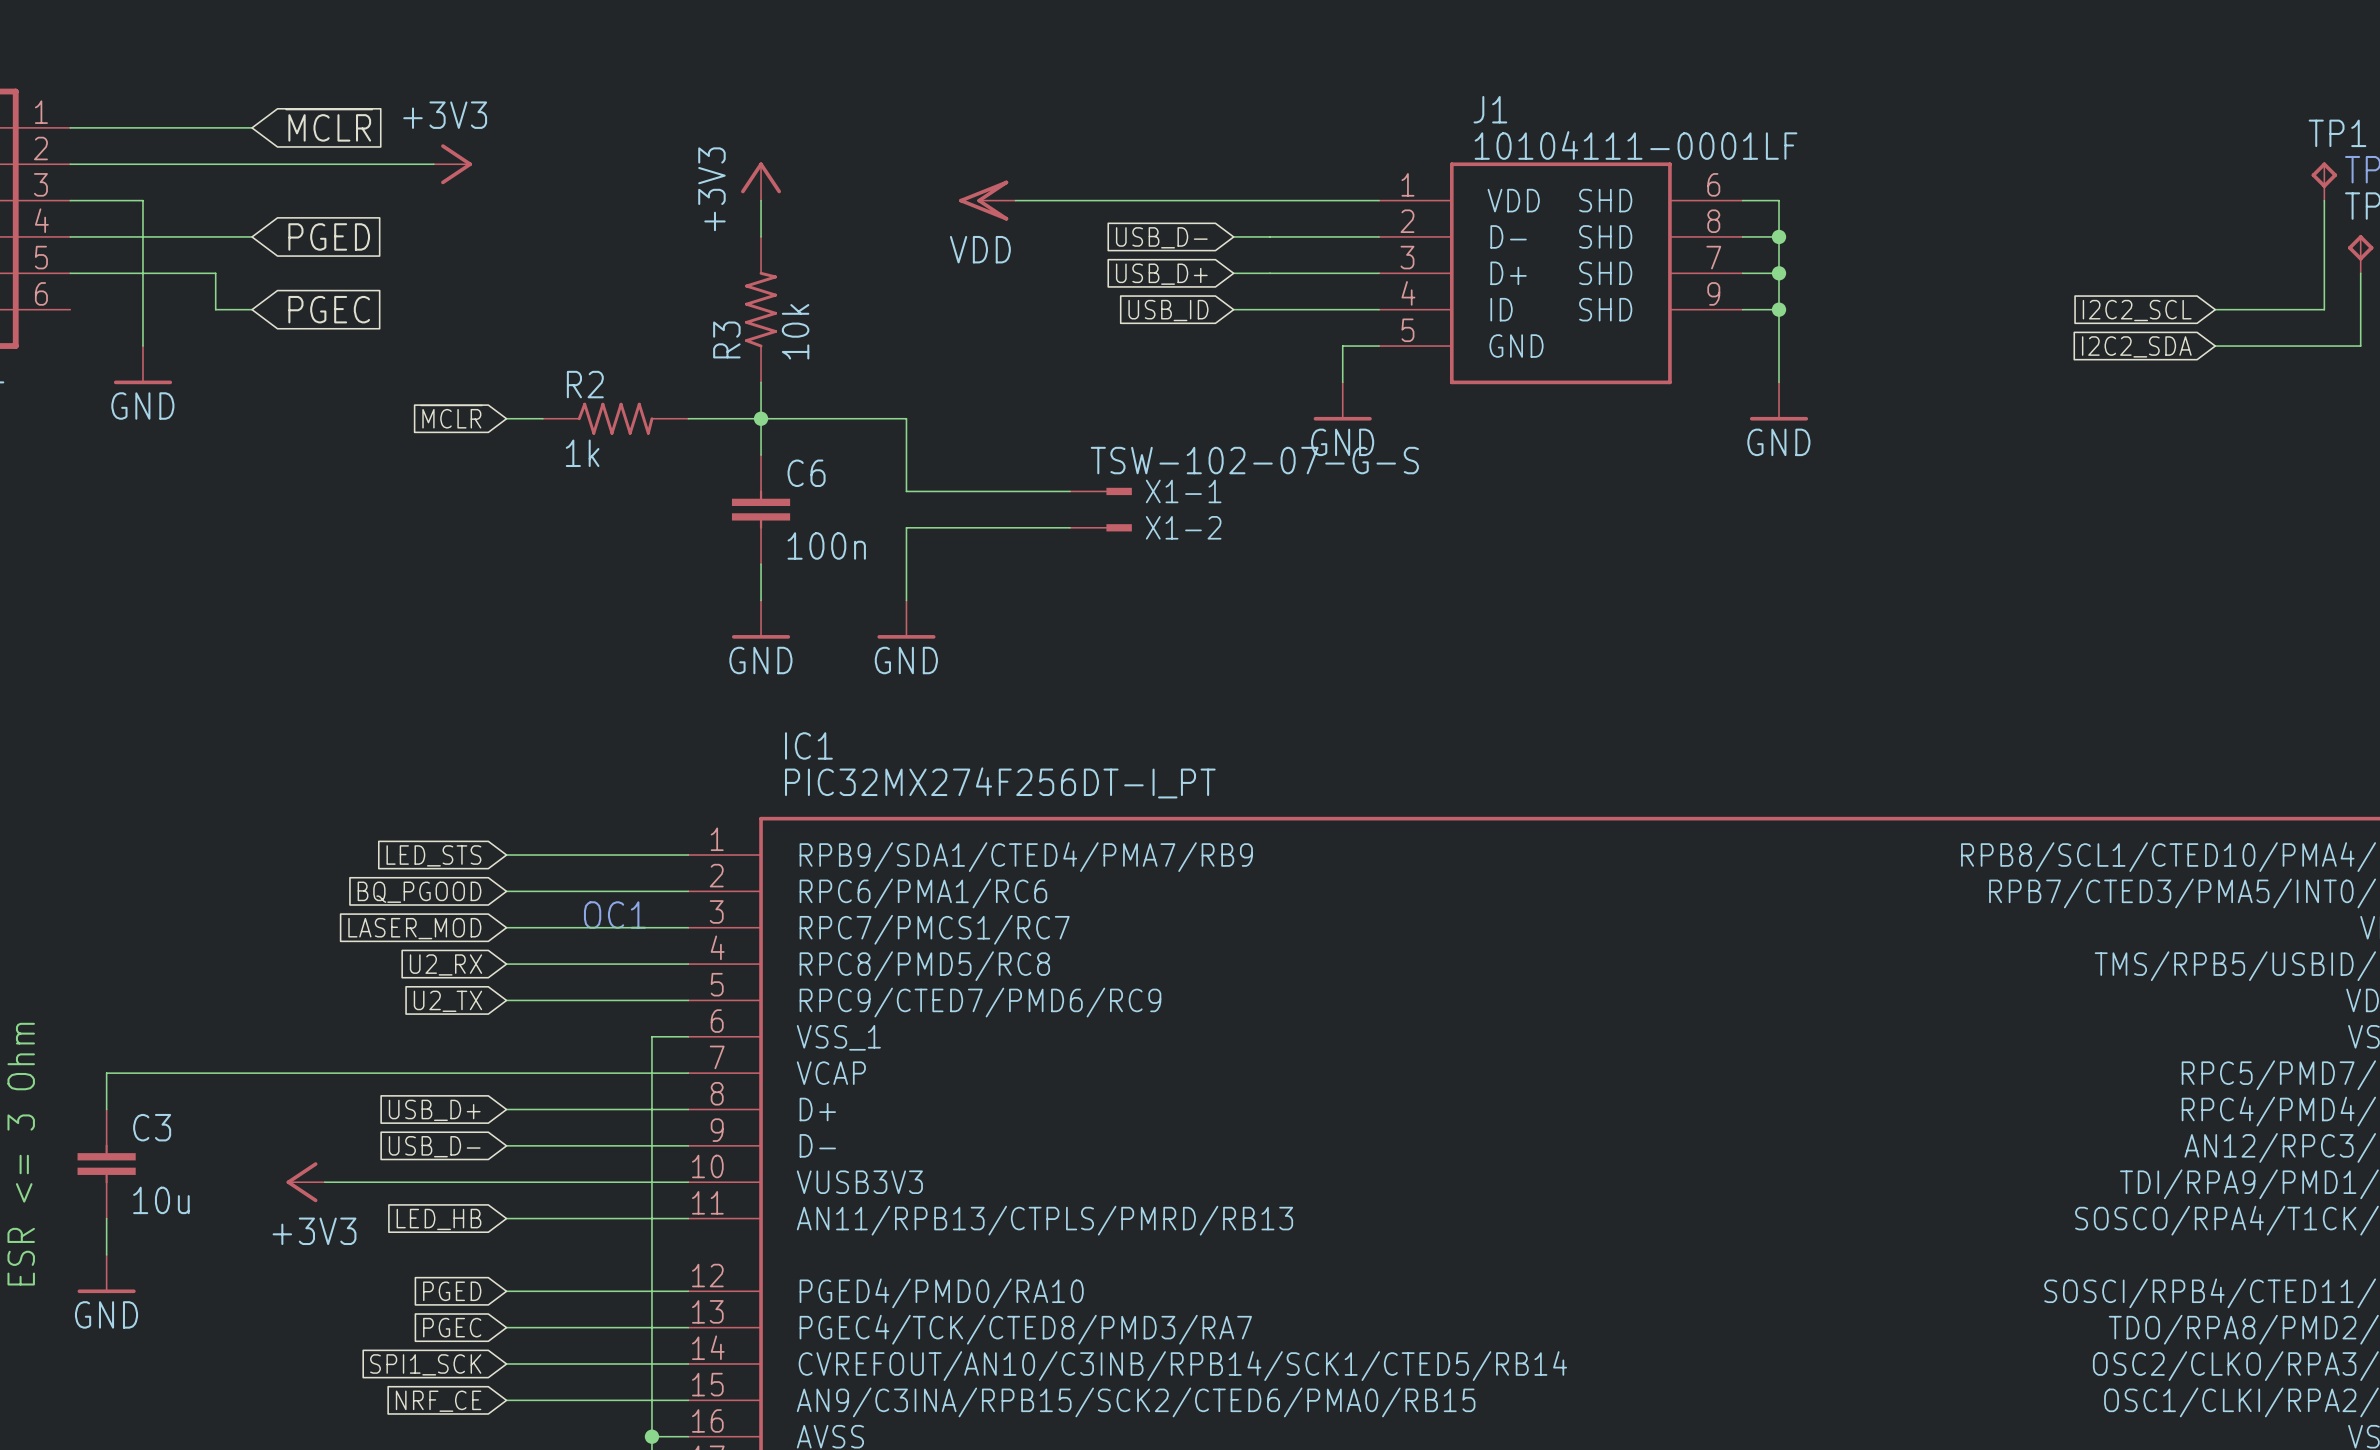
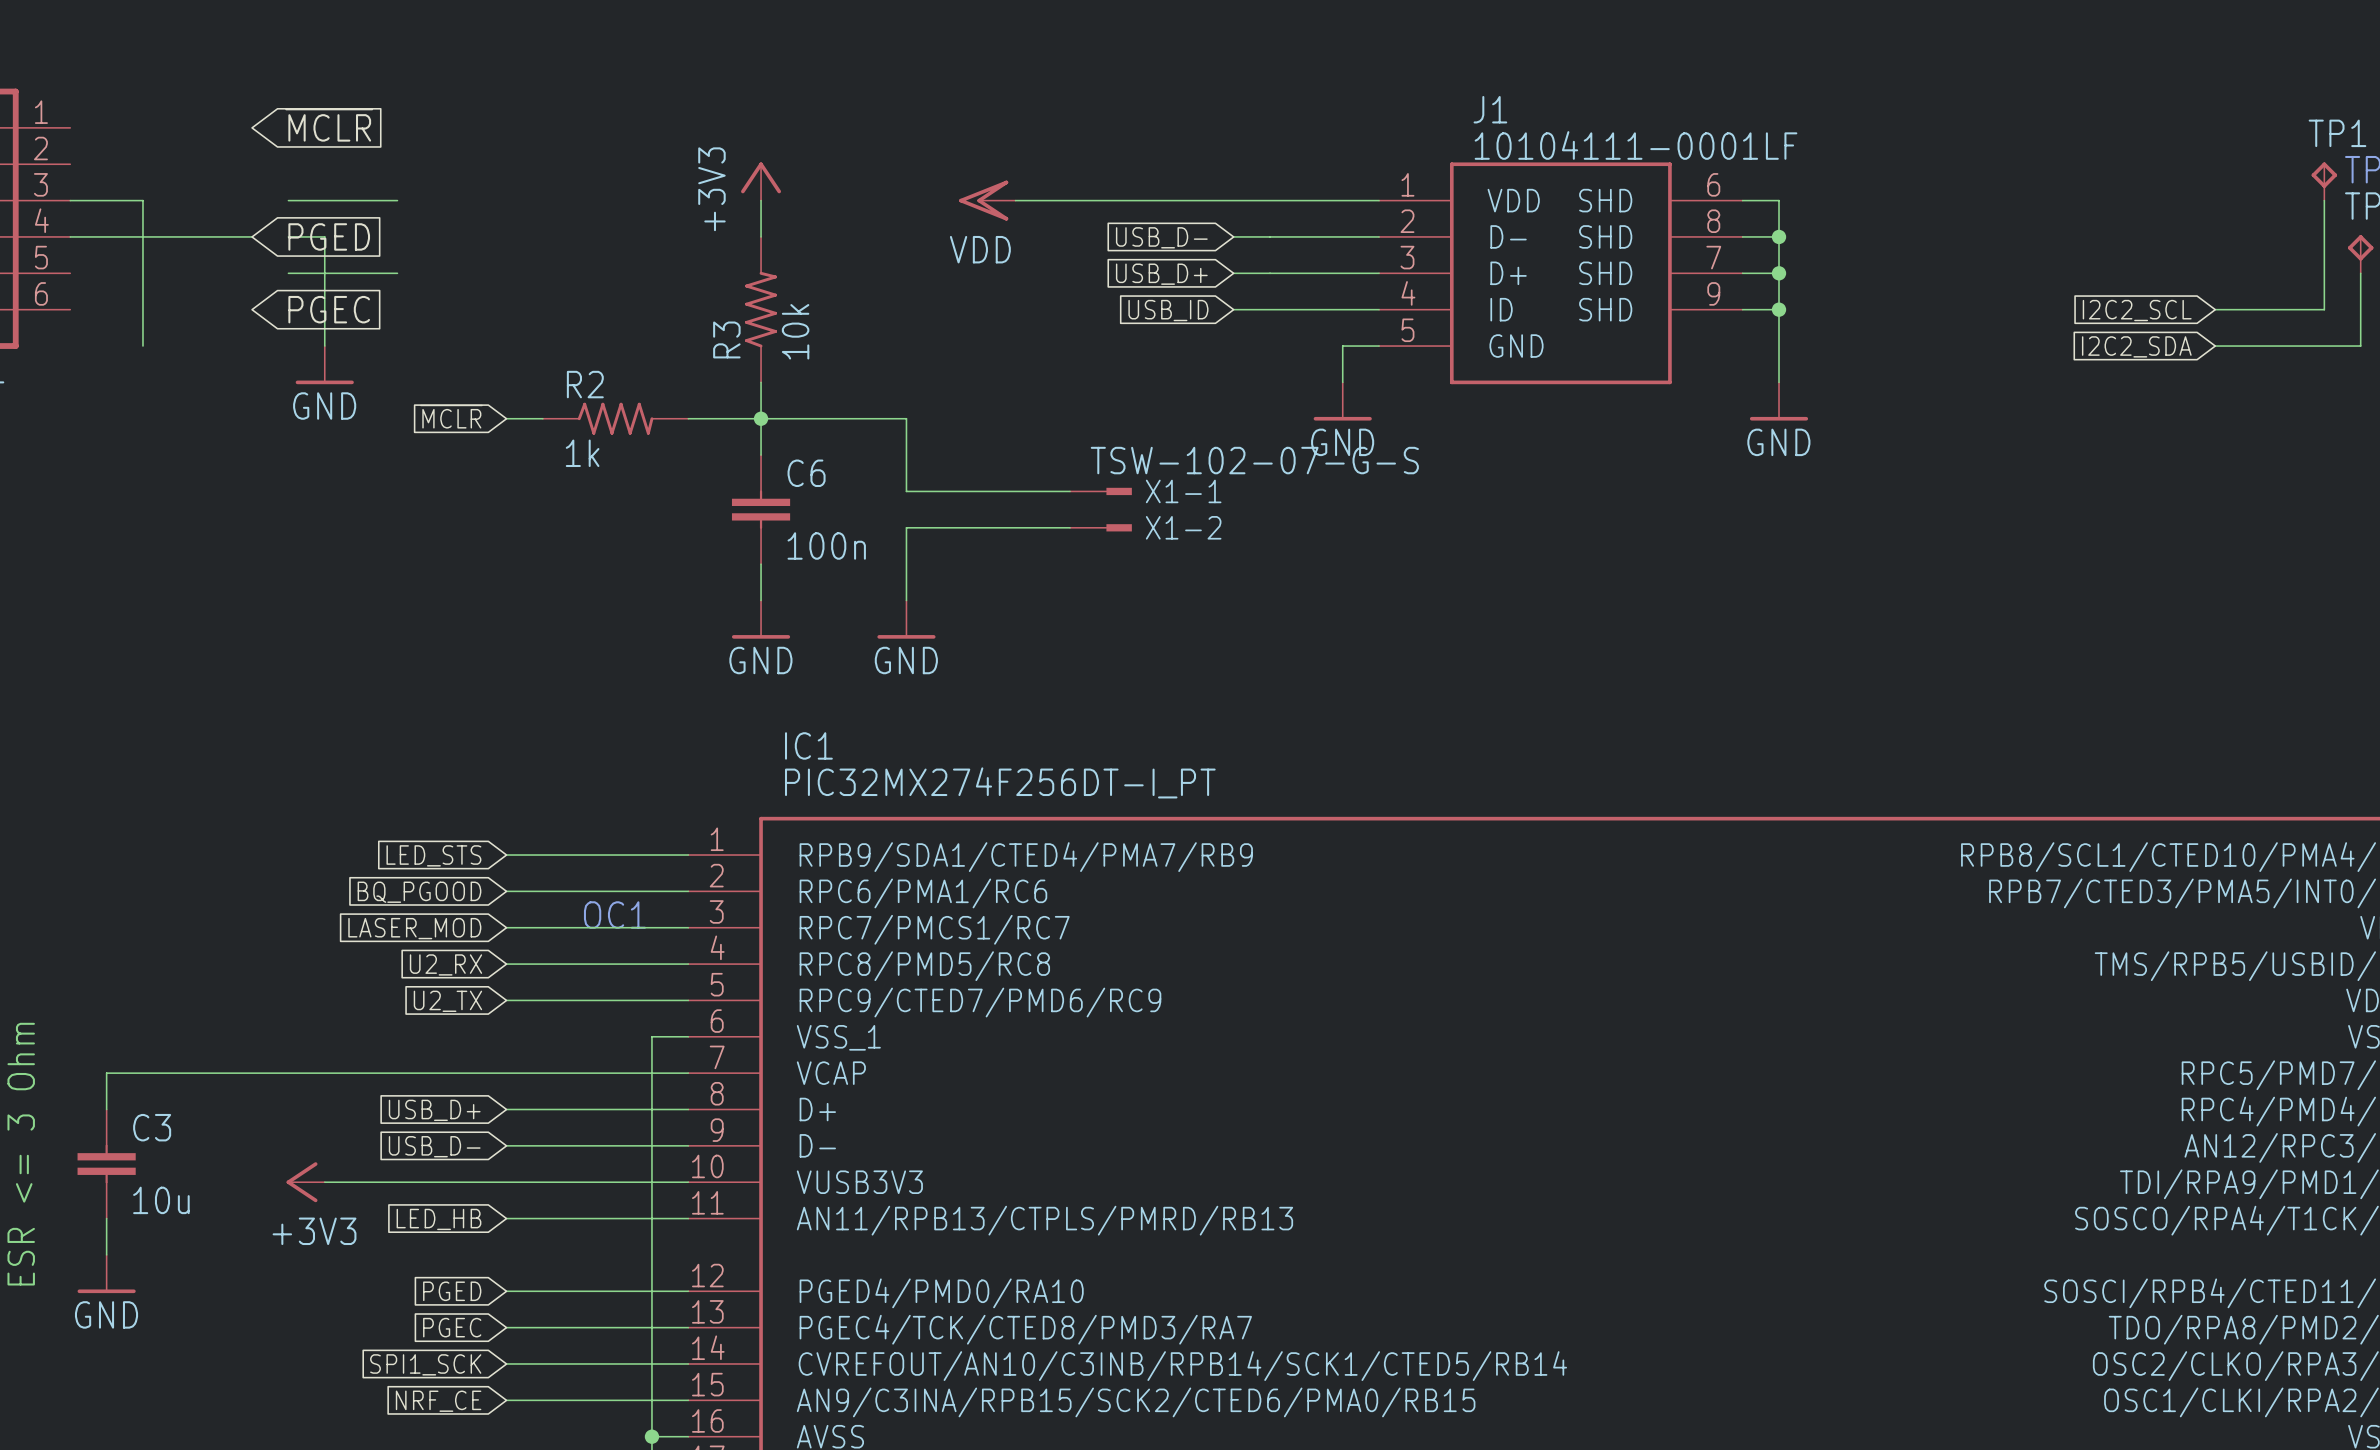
wire: (70, 127) (252, 127) -> none
wire: (70, 164) (433, 164) -> none
power symbol: +3V3 (452, 164) -> none
wire: none -> (288, 200) (397, 200)
wire: none -> (288, 236) (324, 236) (324, 346)
wire: (70, 273) (215, 273) (215, 309) (252, 309) -> none
wire: none -> (288, 273) (397, 273)
power symbol position: GND (142, 365) -> GND (324, 365)

